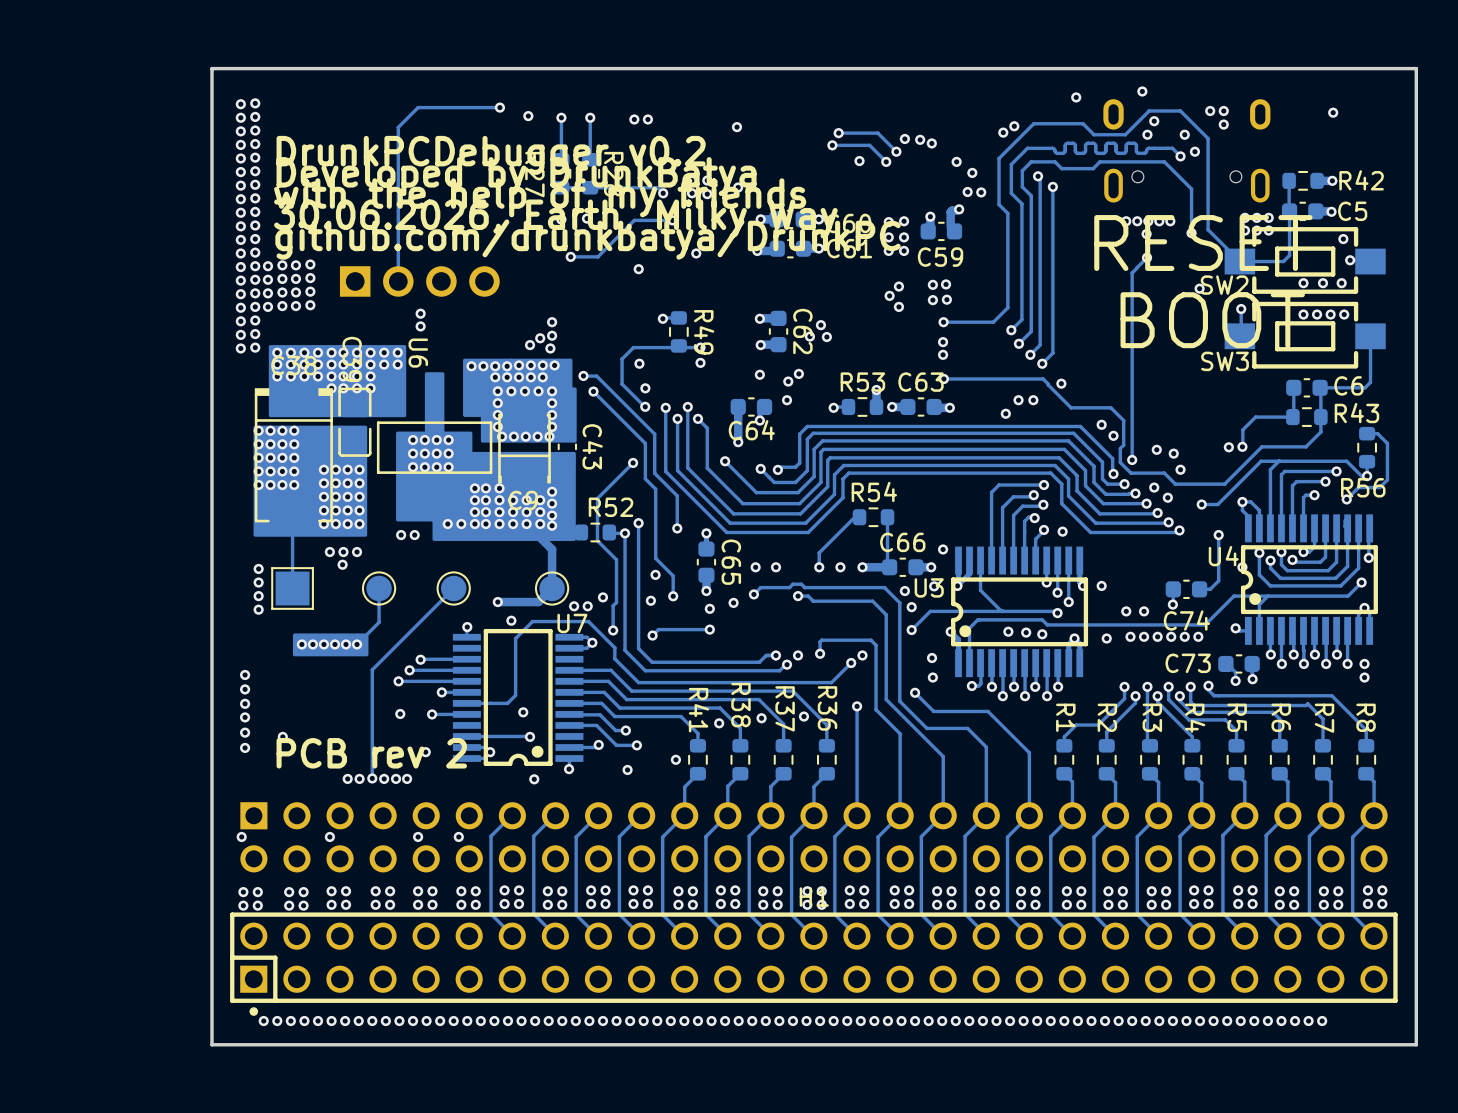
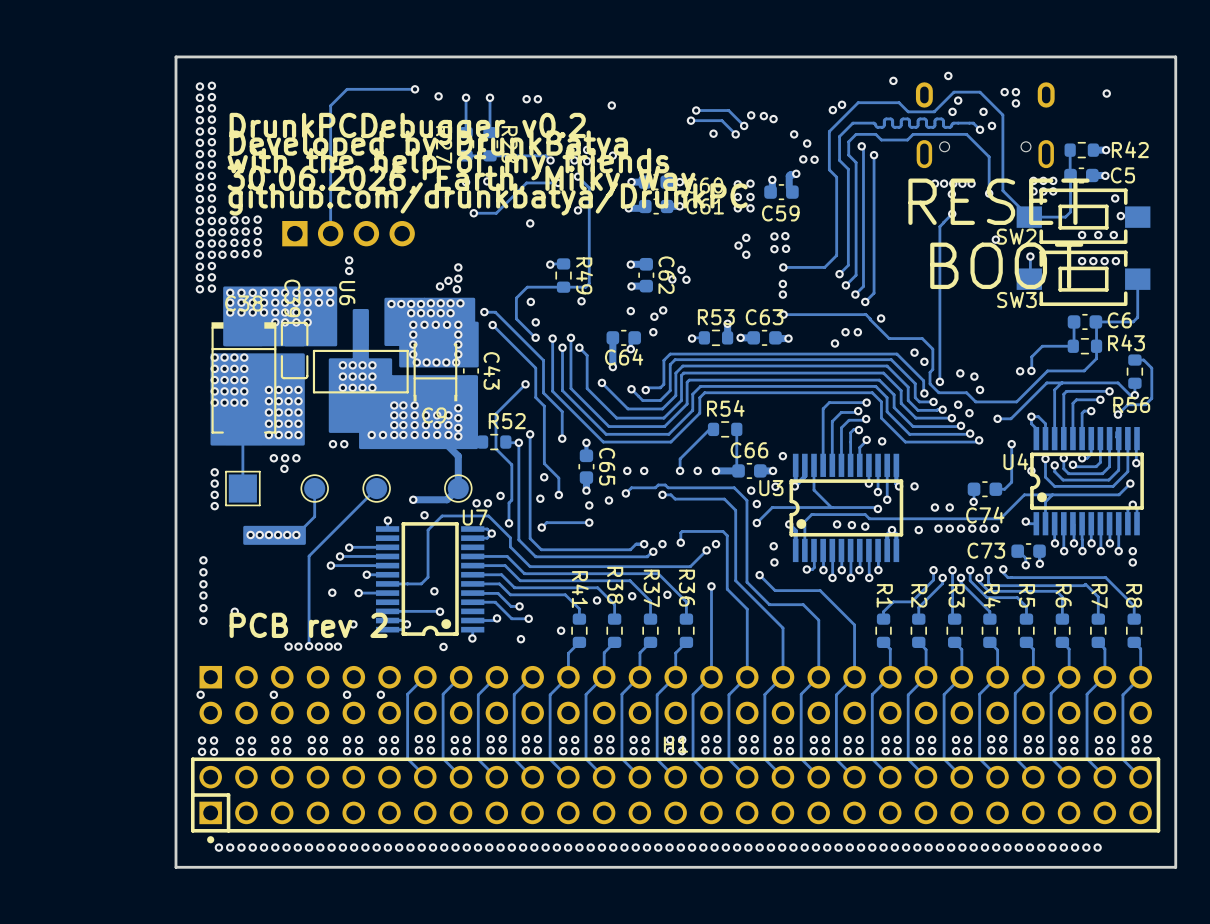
via: none -> (578, 176)
track: (700, 347) (633, 347) -> (578, 176) (589, 187) (589, 283) (585, 287) (525, 288)
via: (700, 347) -> none

